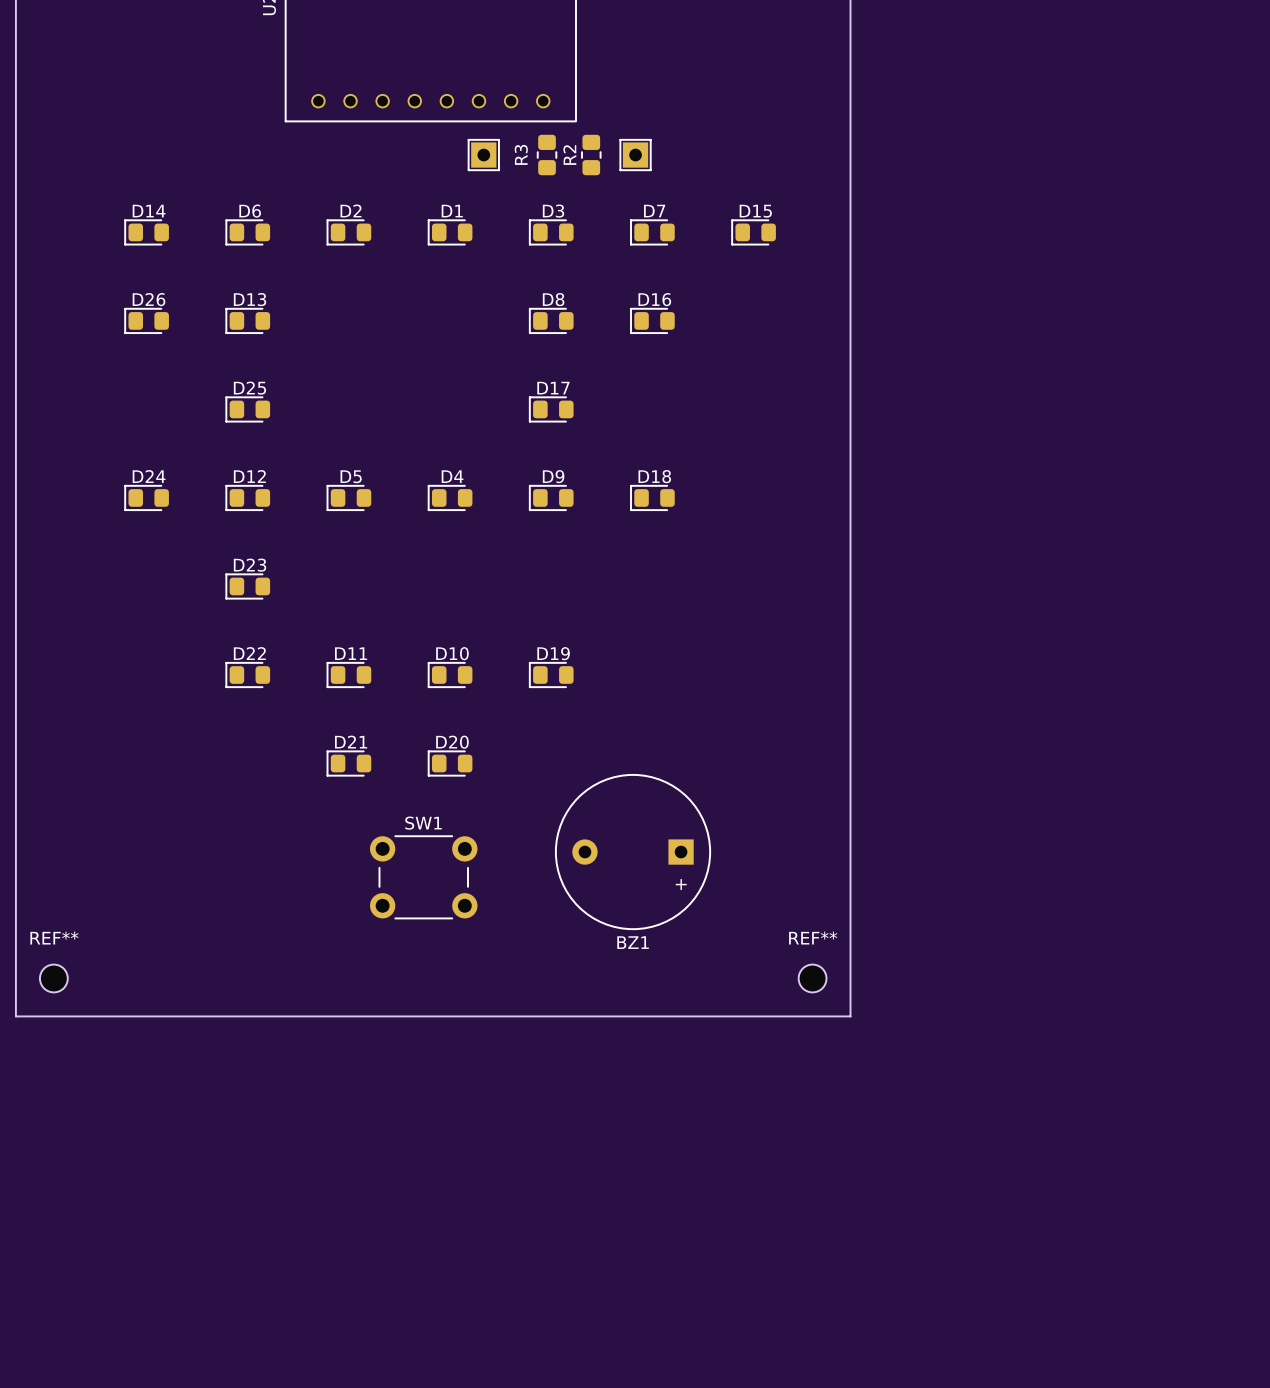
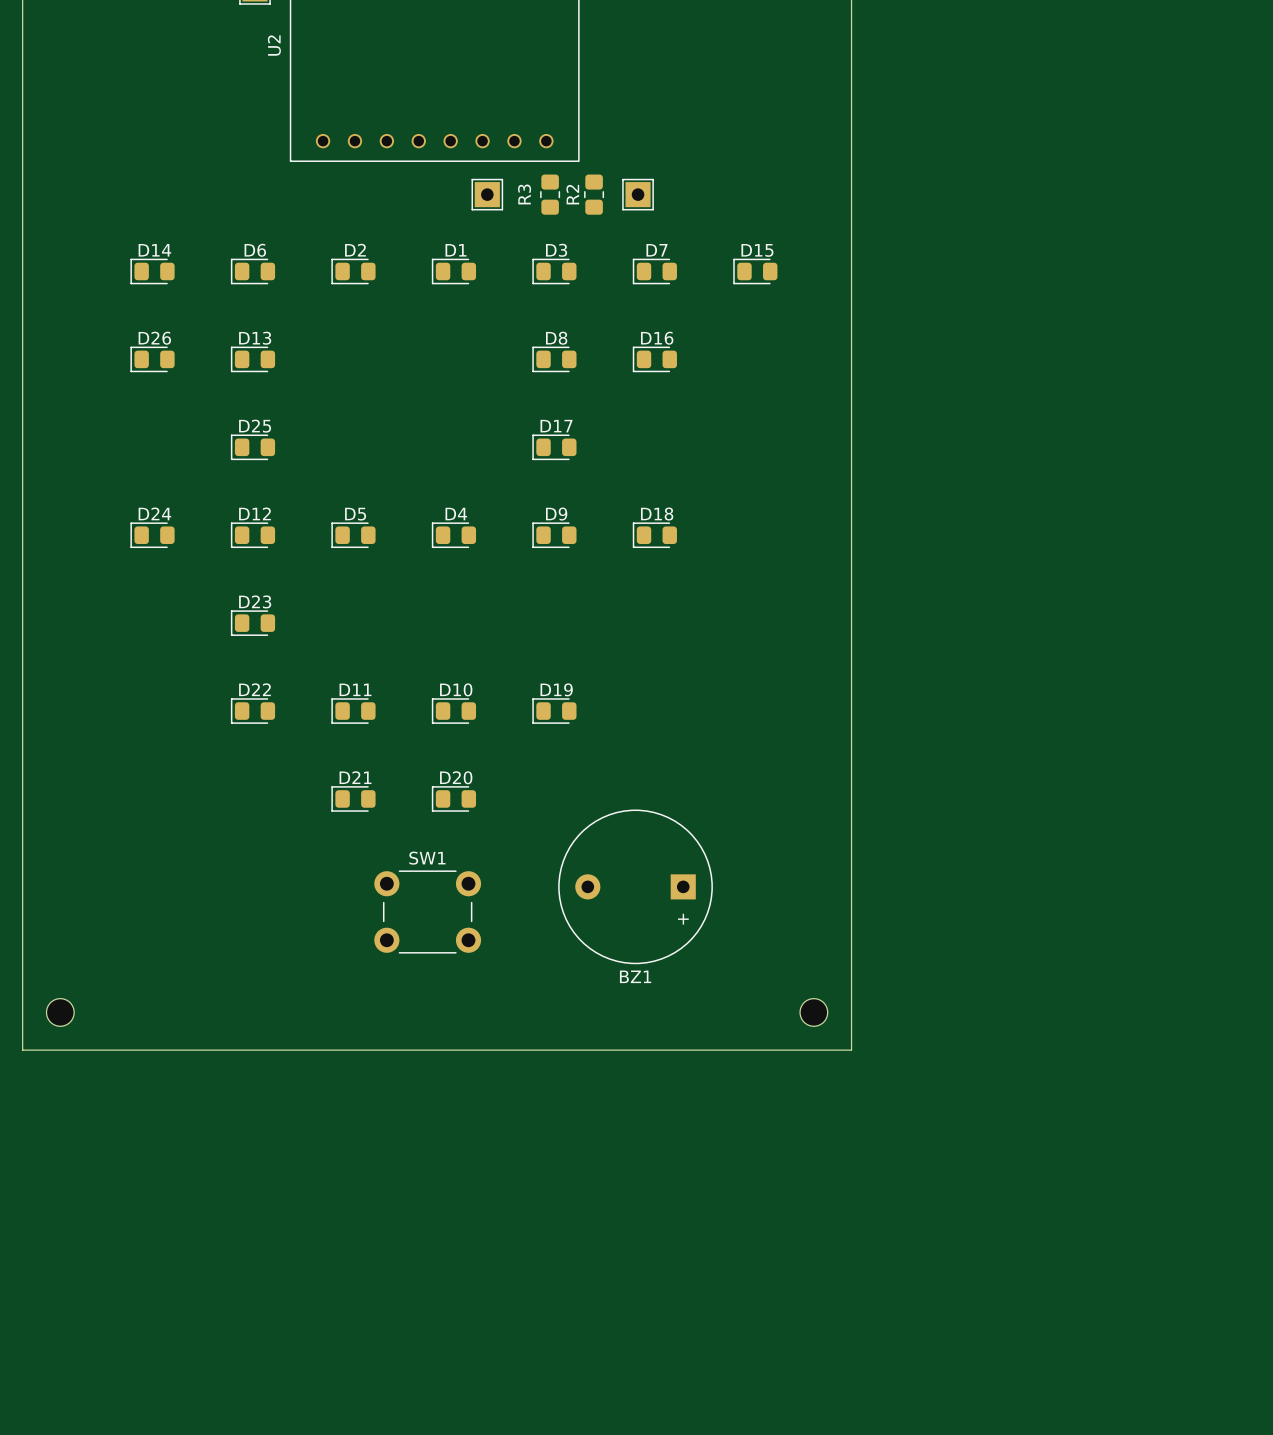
REF** name: REF** (54, 938) -> none
REF** name: REF** (813, 938) -> none

